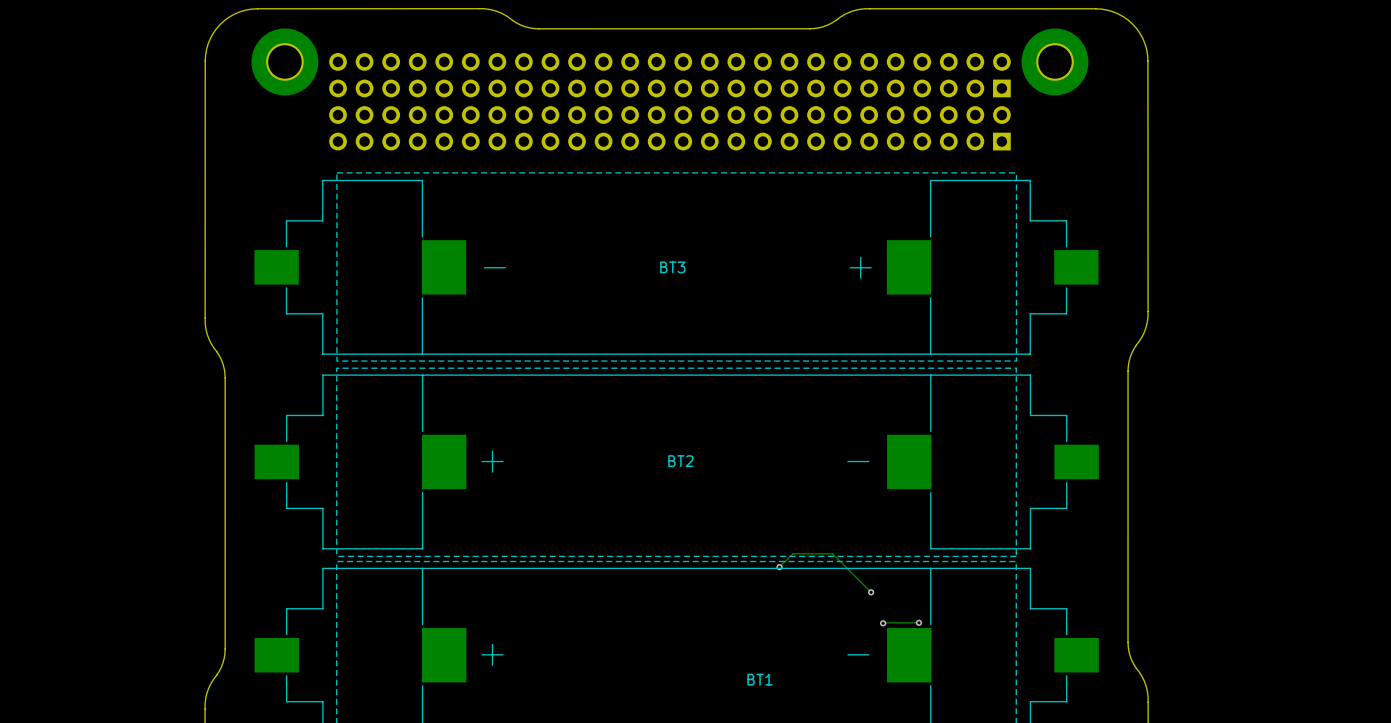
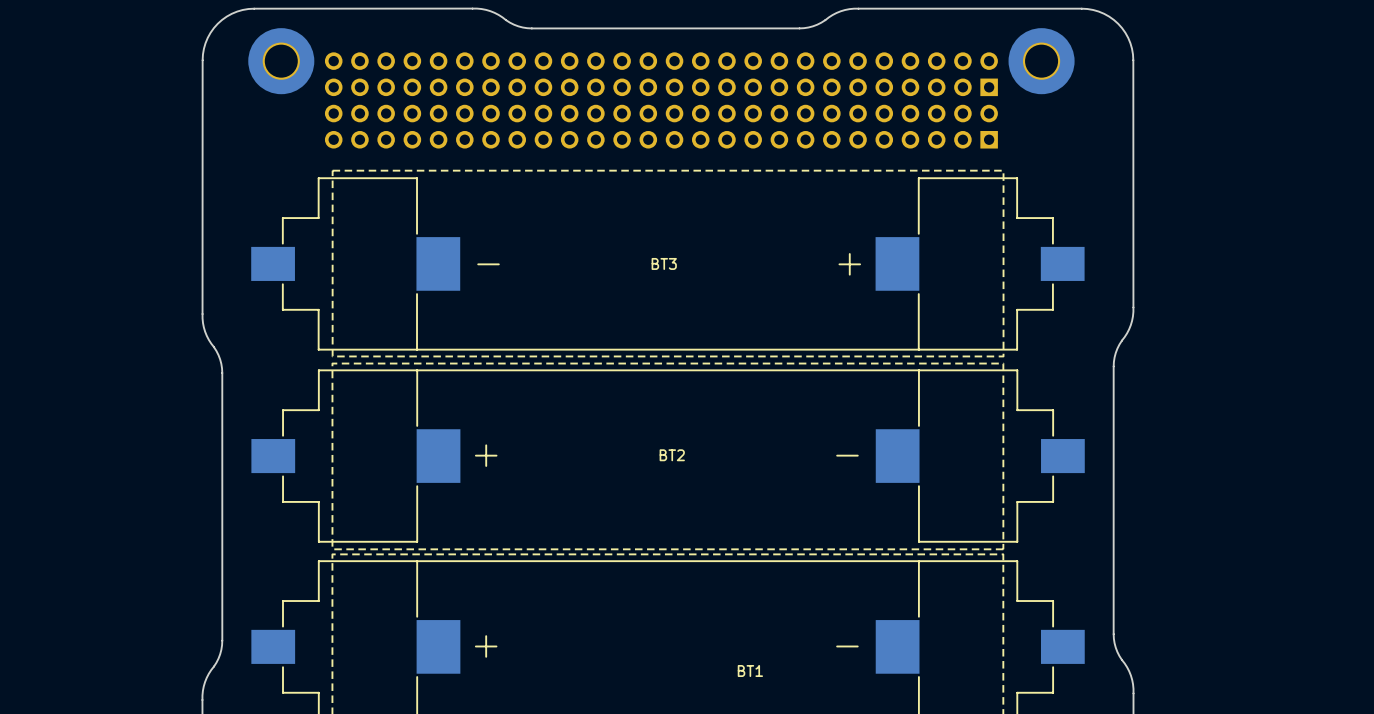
track: (778, 567) (792, 553) (832, 553) (871, 592) -> none
via: (779, 567) -> none
via: (871, 592) -> none
track: (918, 622) (883, 623) -> none
via: (918, 622) -> none
via: (883, 623) -> none

